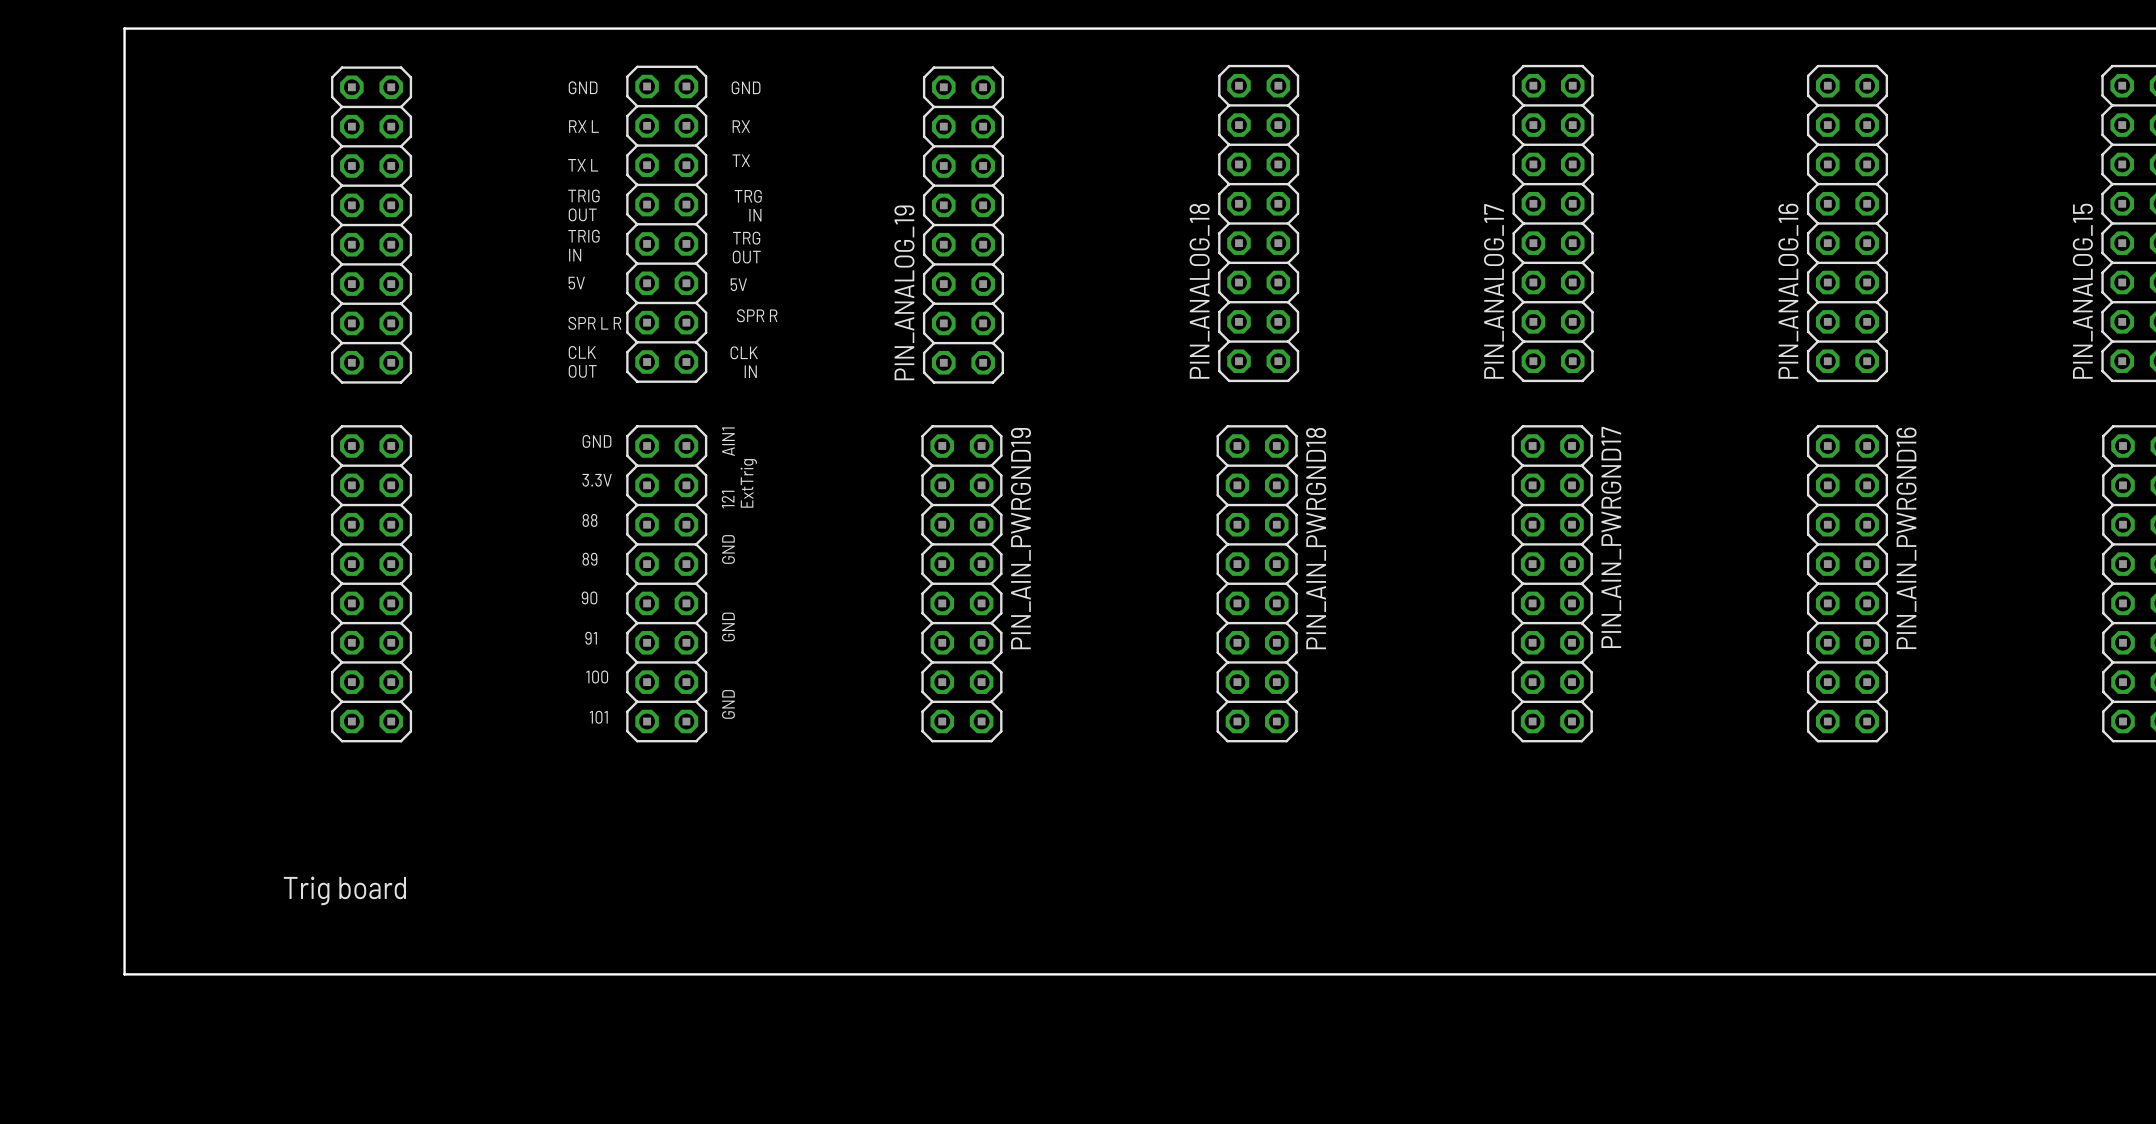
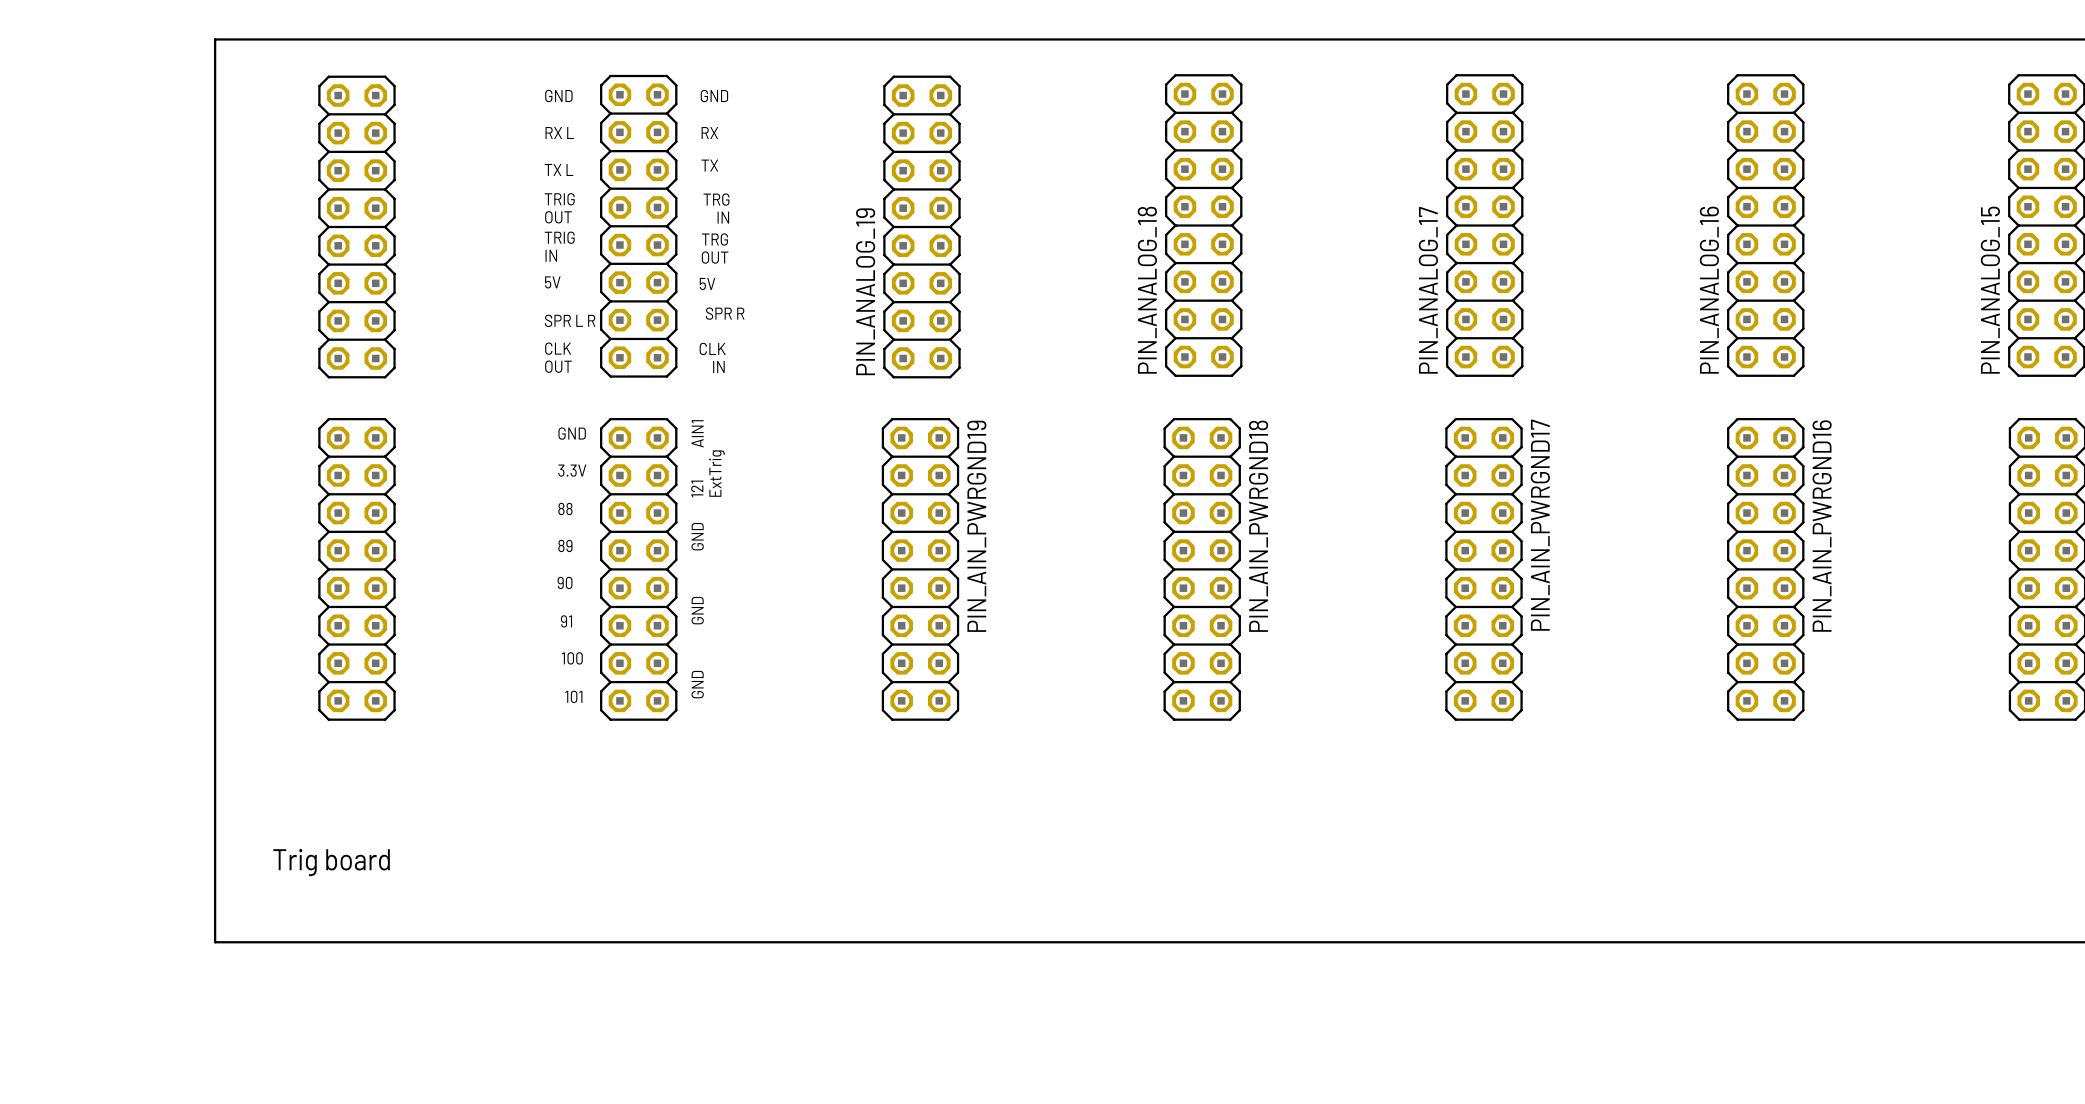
board edge: (222, 28) (124, 28) (124, 974) (222, 974) -> (215, 39) (215, 942)

